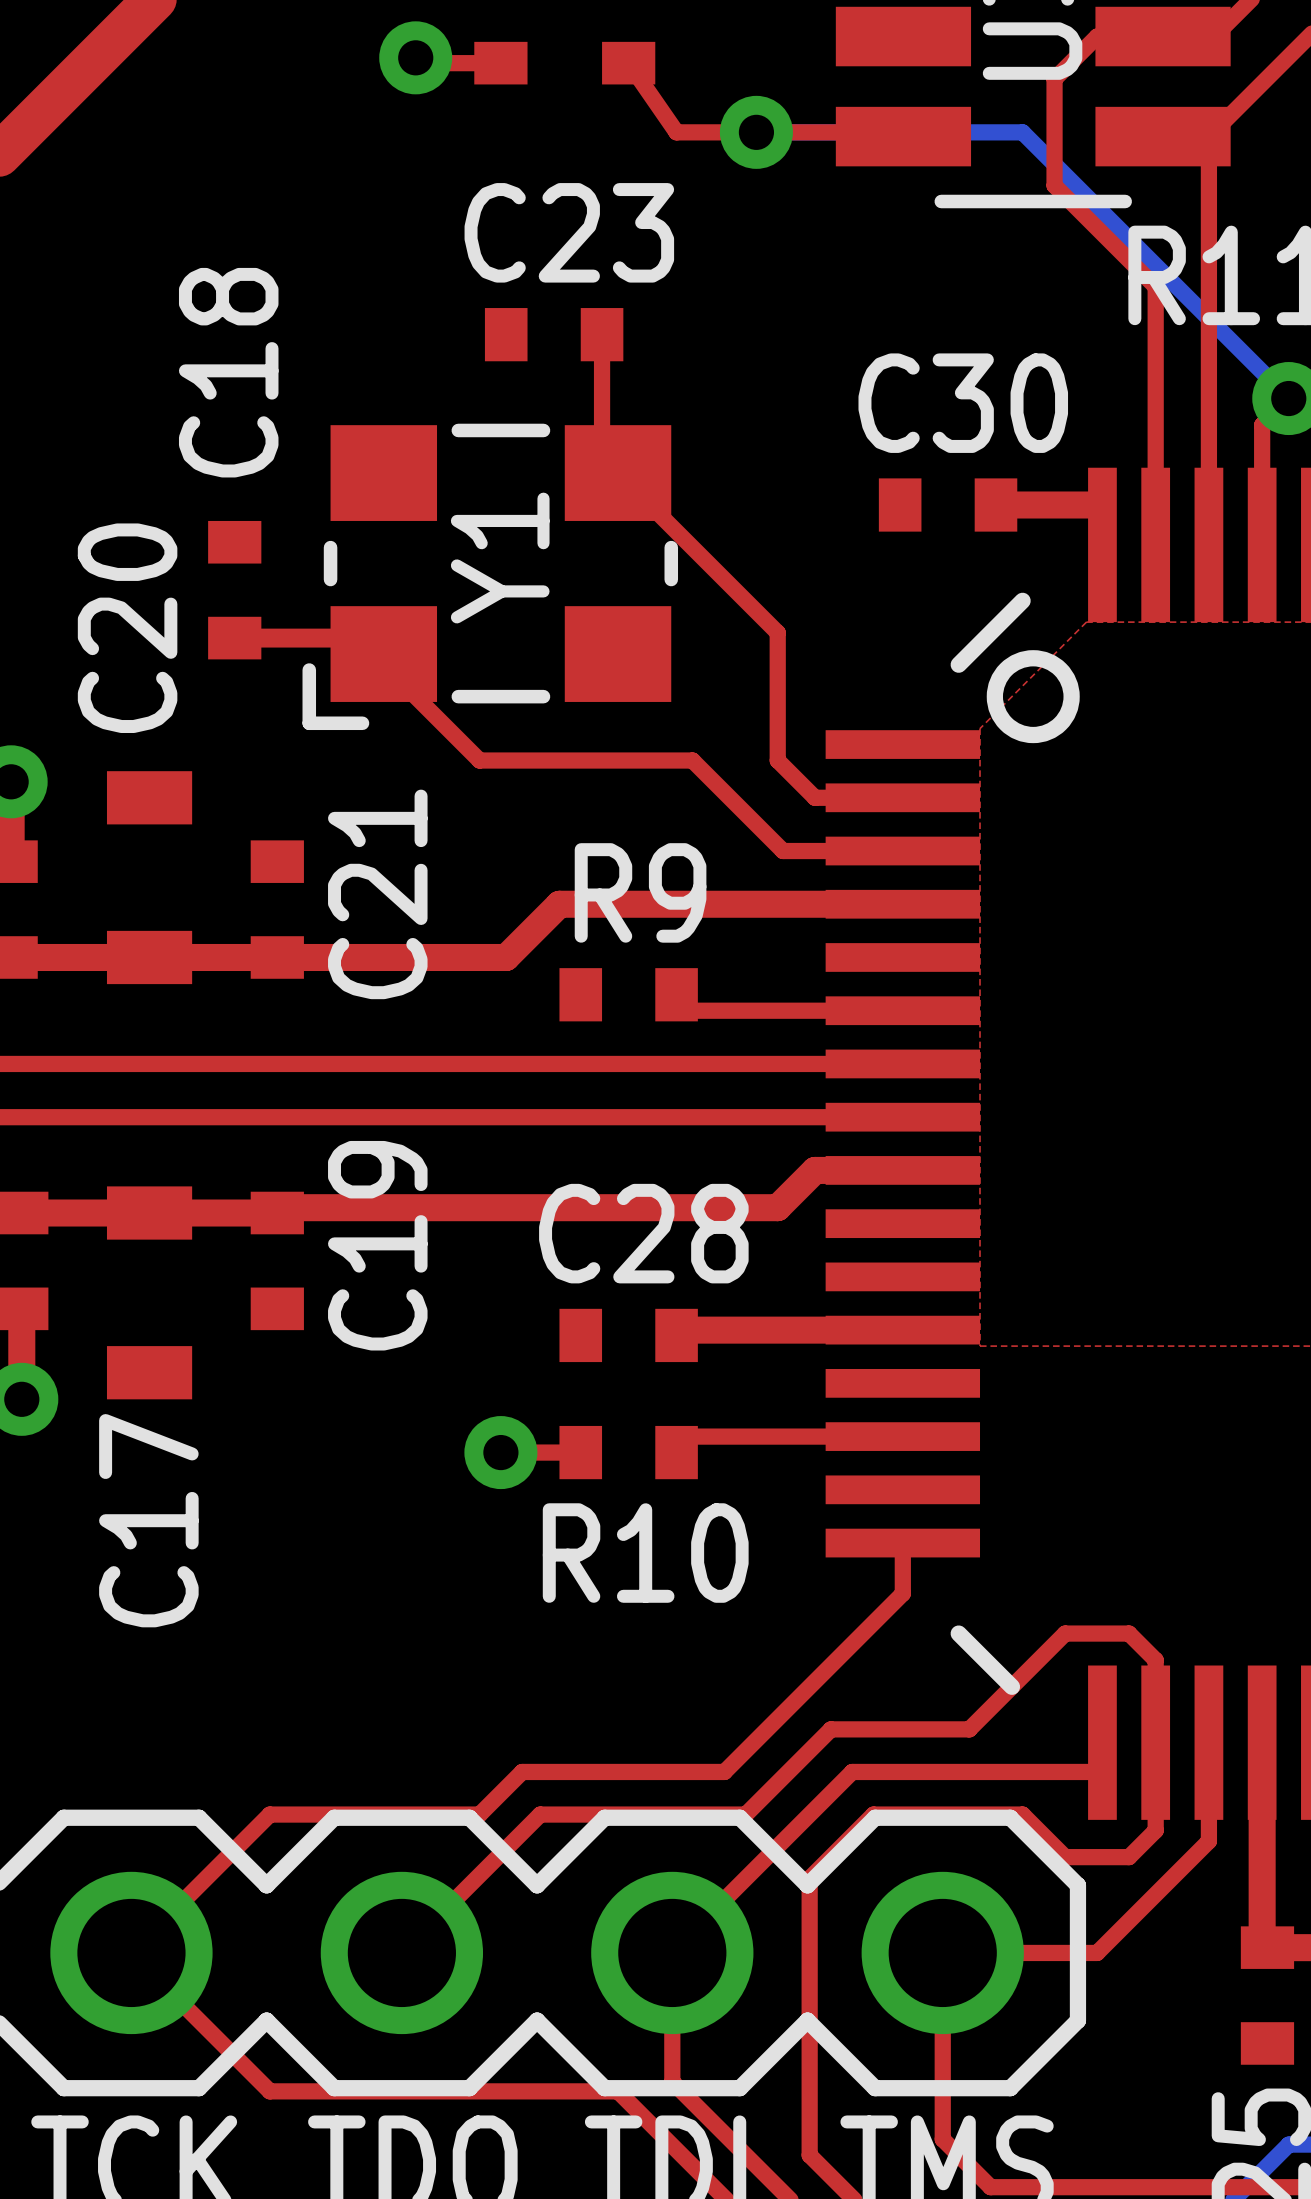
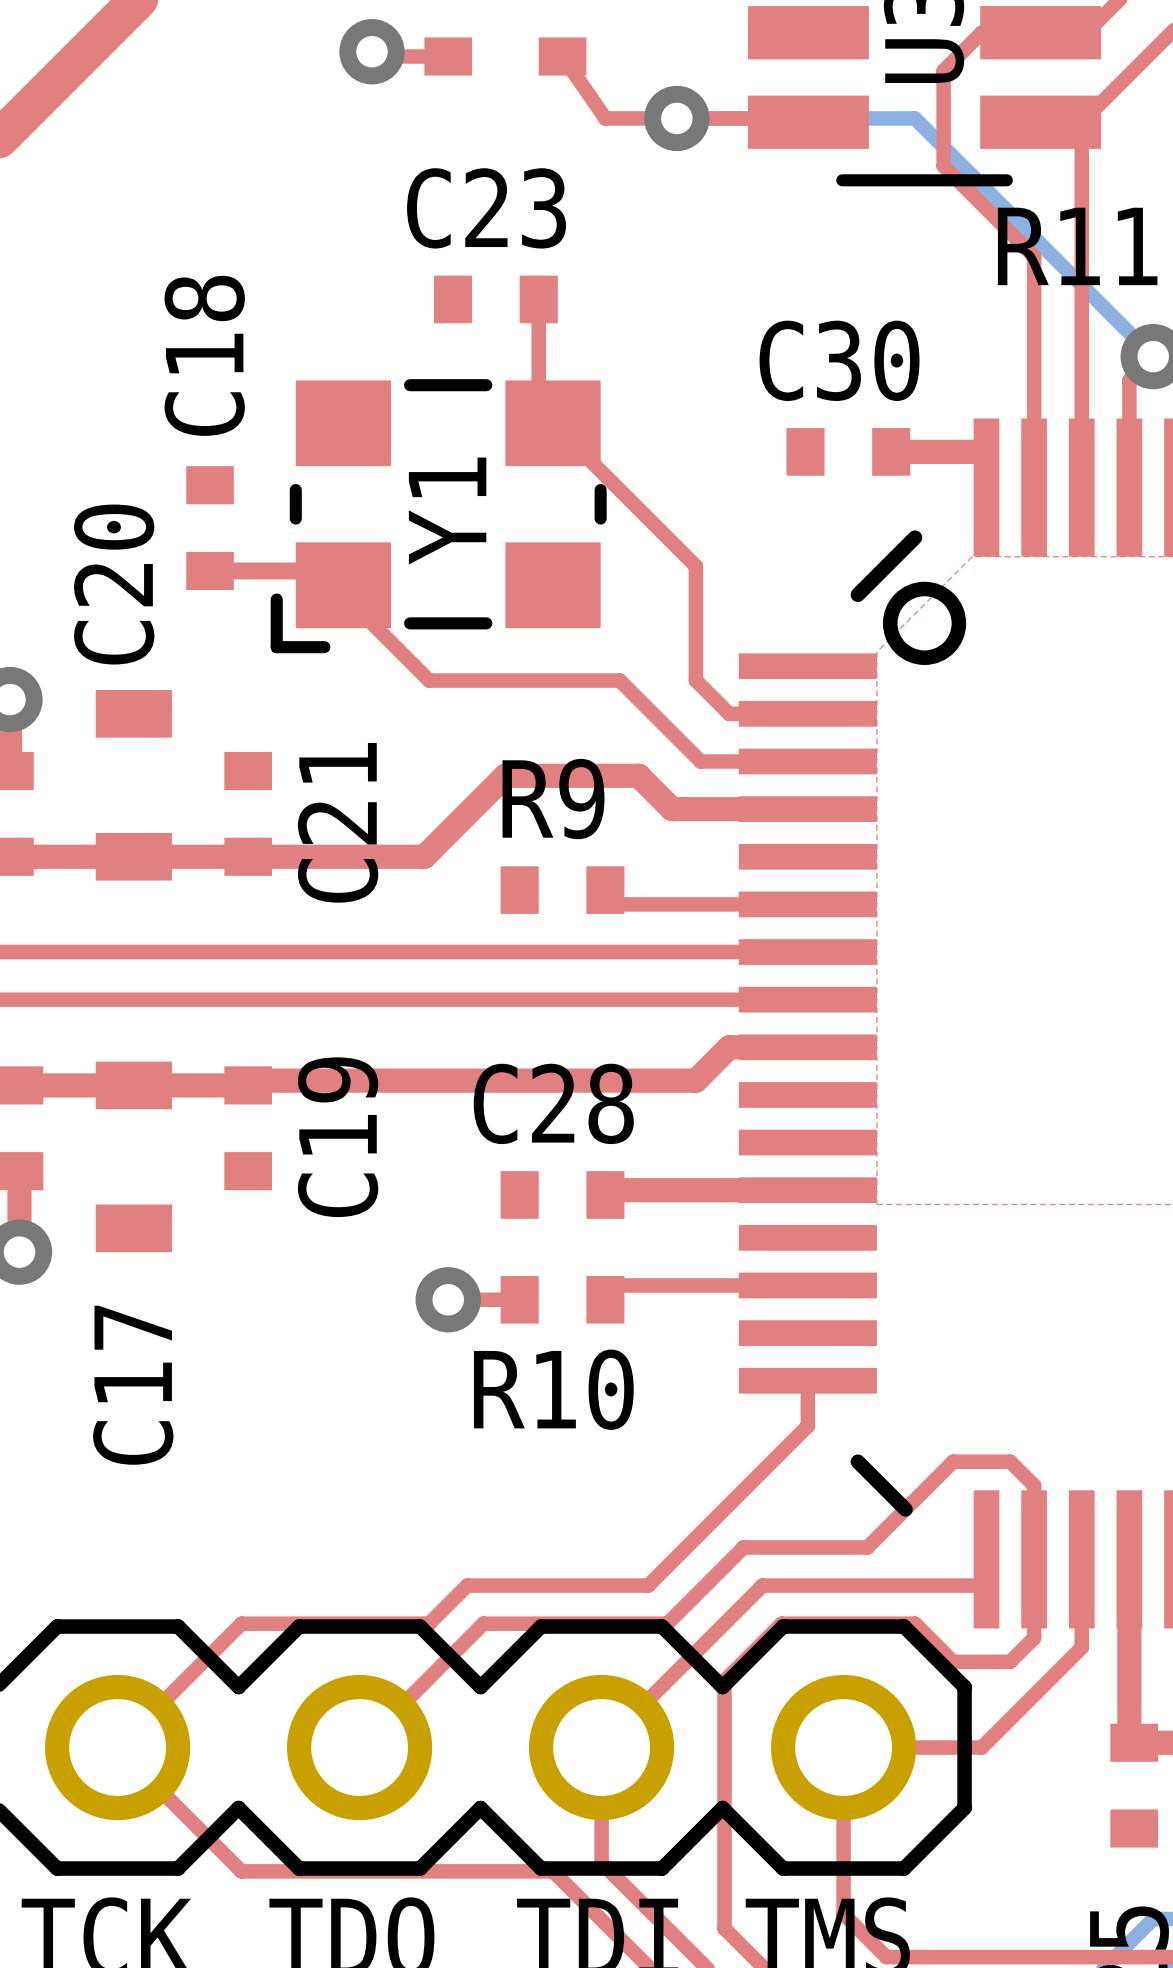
top track: (751, 904) (559, 904) (506, 957) (474, 957) -> (672, 809) (638, 775) (505, 775) (424, 856)

